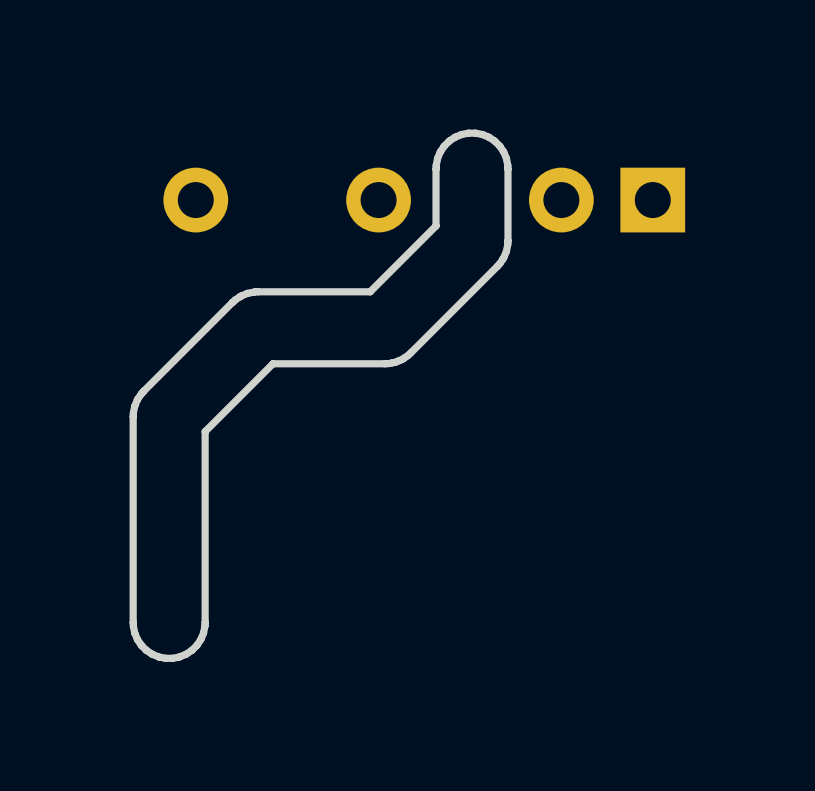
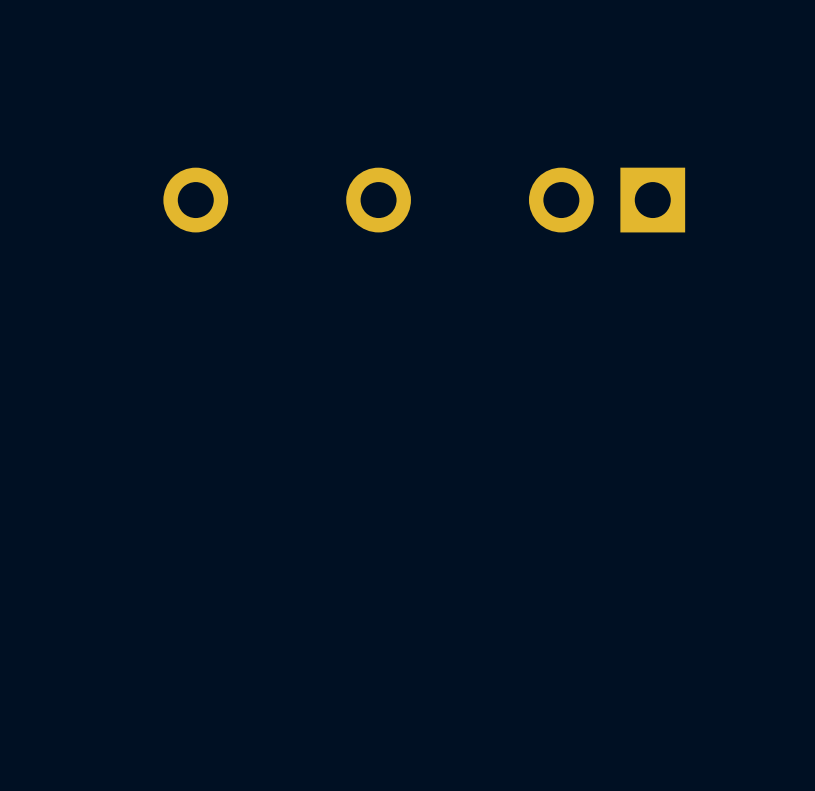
board edge: (475, 133) (494, 141) (506, 158) (507, 240) (503, 257) (410, 353) (402, 359) (385, 363) (272, 363) (205, 431) (203, 632) (191, 650) (179, 656) (165, 658) (152, 654) (137, 639) (133, 626) (133, 416) (137, 399) (232, 302) (241, 296) (258, 291) (370, 291) (436, 225) (436, 165) (440, 152) (455, 137) (475, 133) -> none

